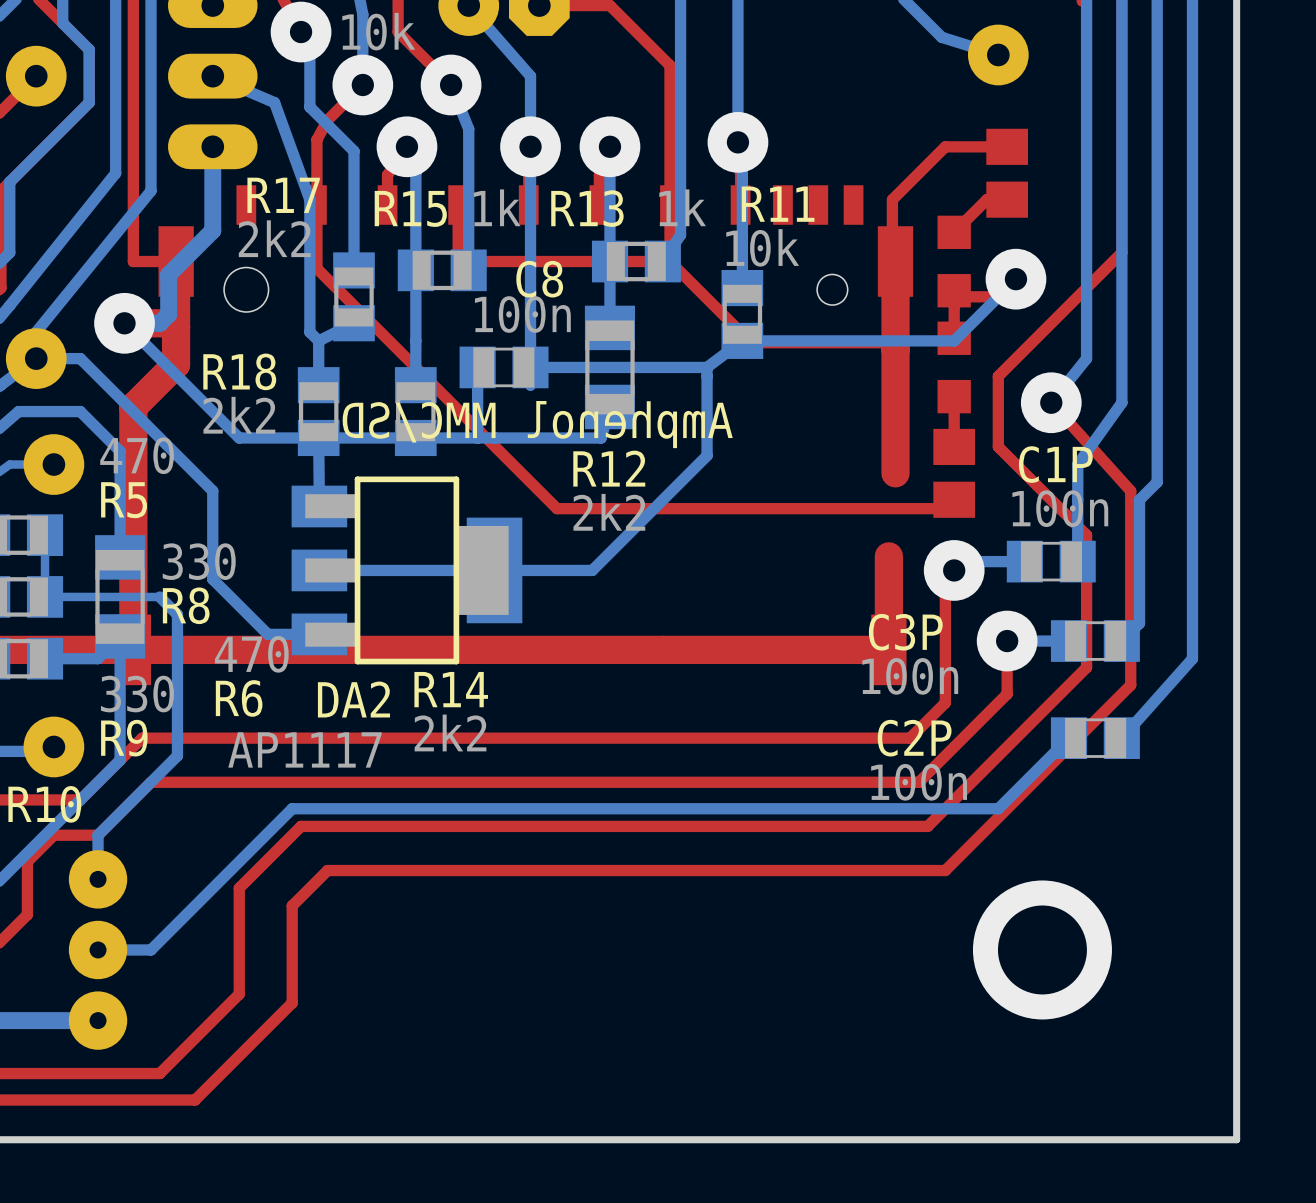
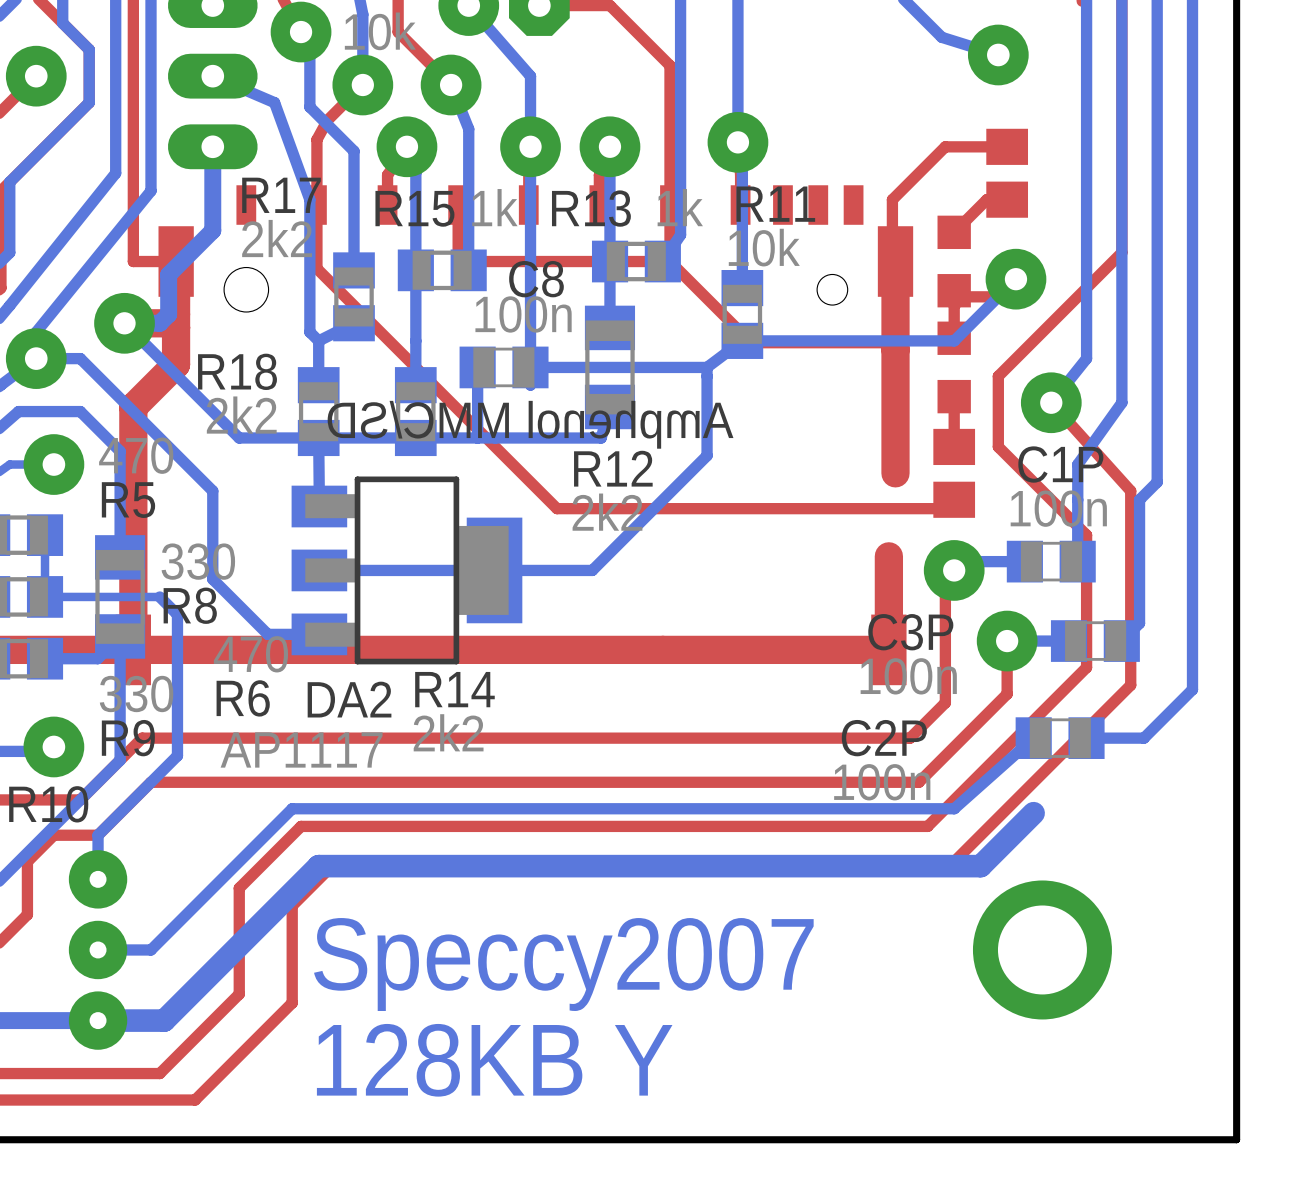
bottom track: (1192, 658) (1121, 738) -> (1192, 658) (1192, 689) (1143, 738) (1086, 738)
bottom track: (1069, 738) (998, 808) (954, 808) -> (1033, 738) (954, 808)
C2P position: (1095, 738) -> (1060, 738)
bottom track: none -> (1033, 813) (980, 866) (318, 866) (164, 1020) (98, 1020)
text: none -> Speccy2007 (563, 964)
text: none -> 128KB Y (494, 1060)

